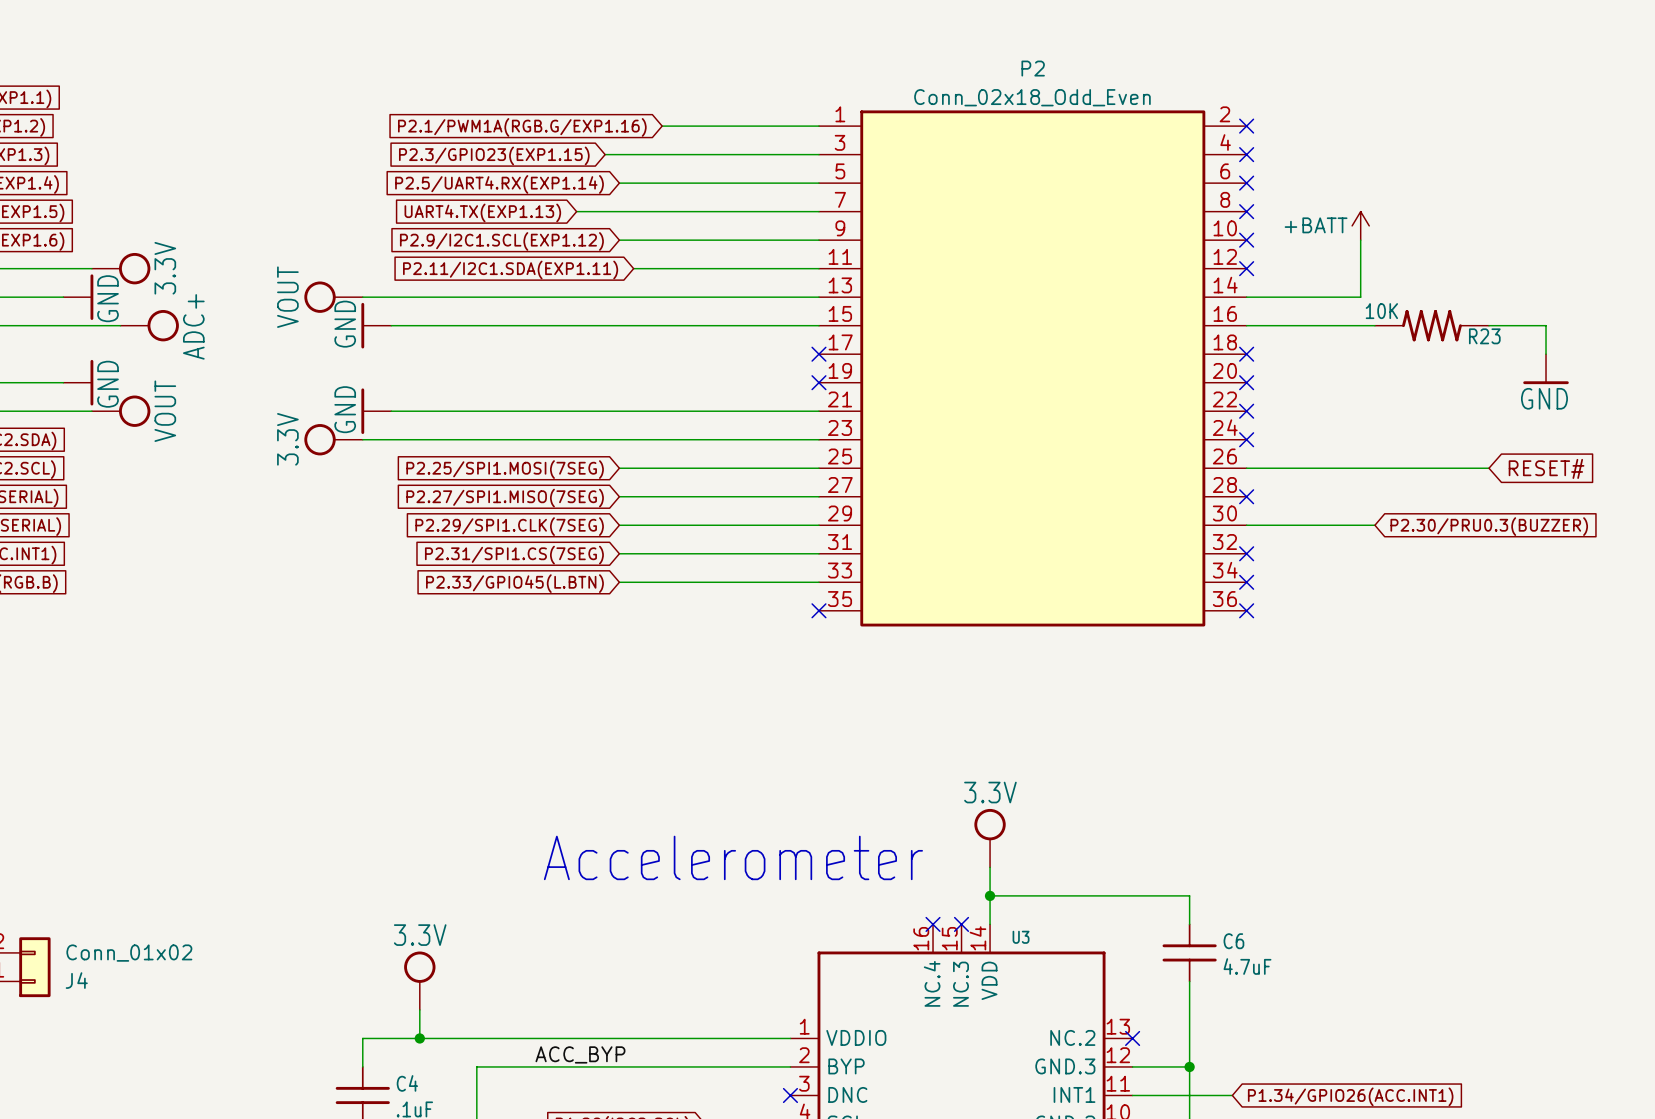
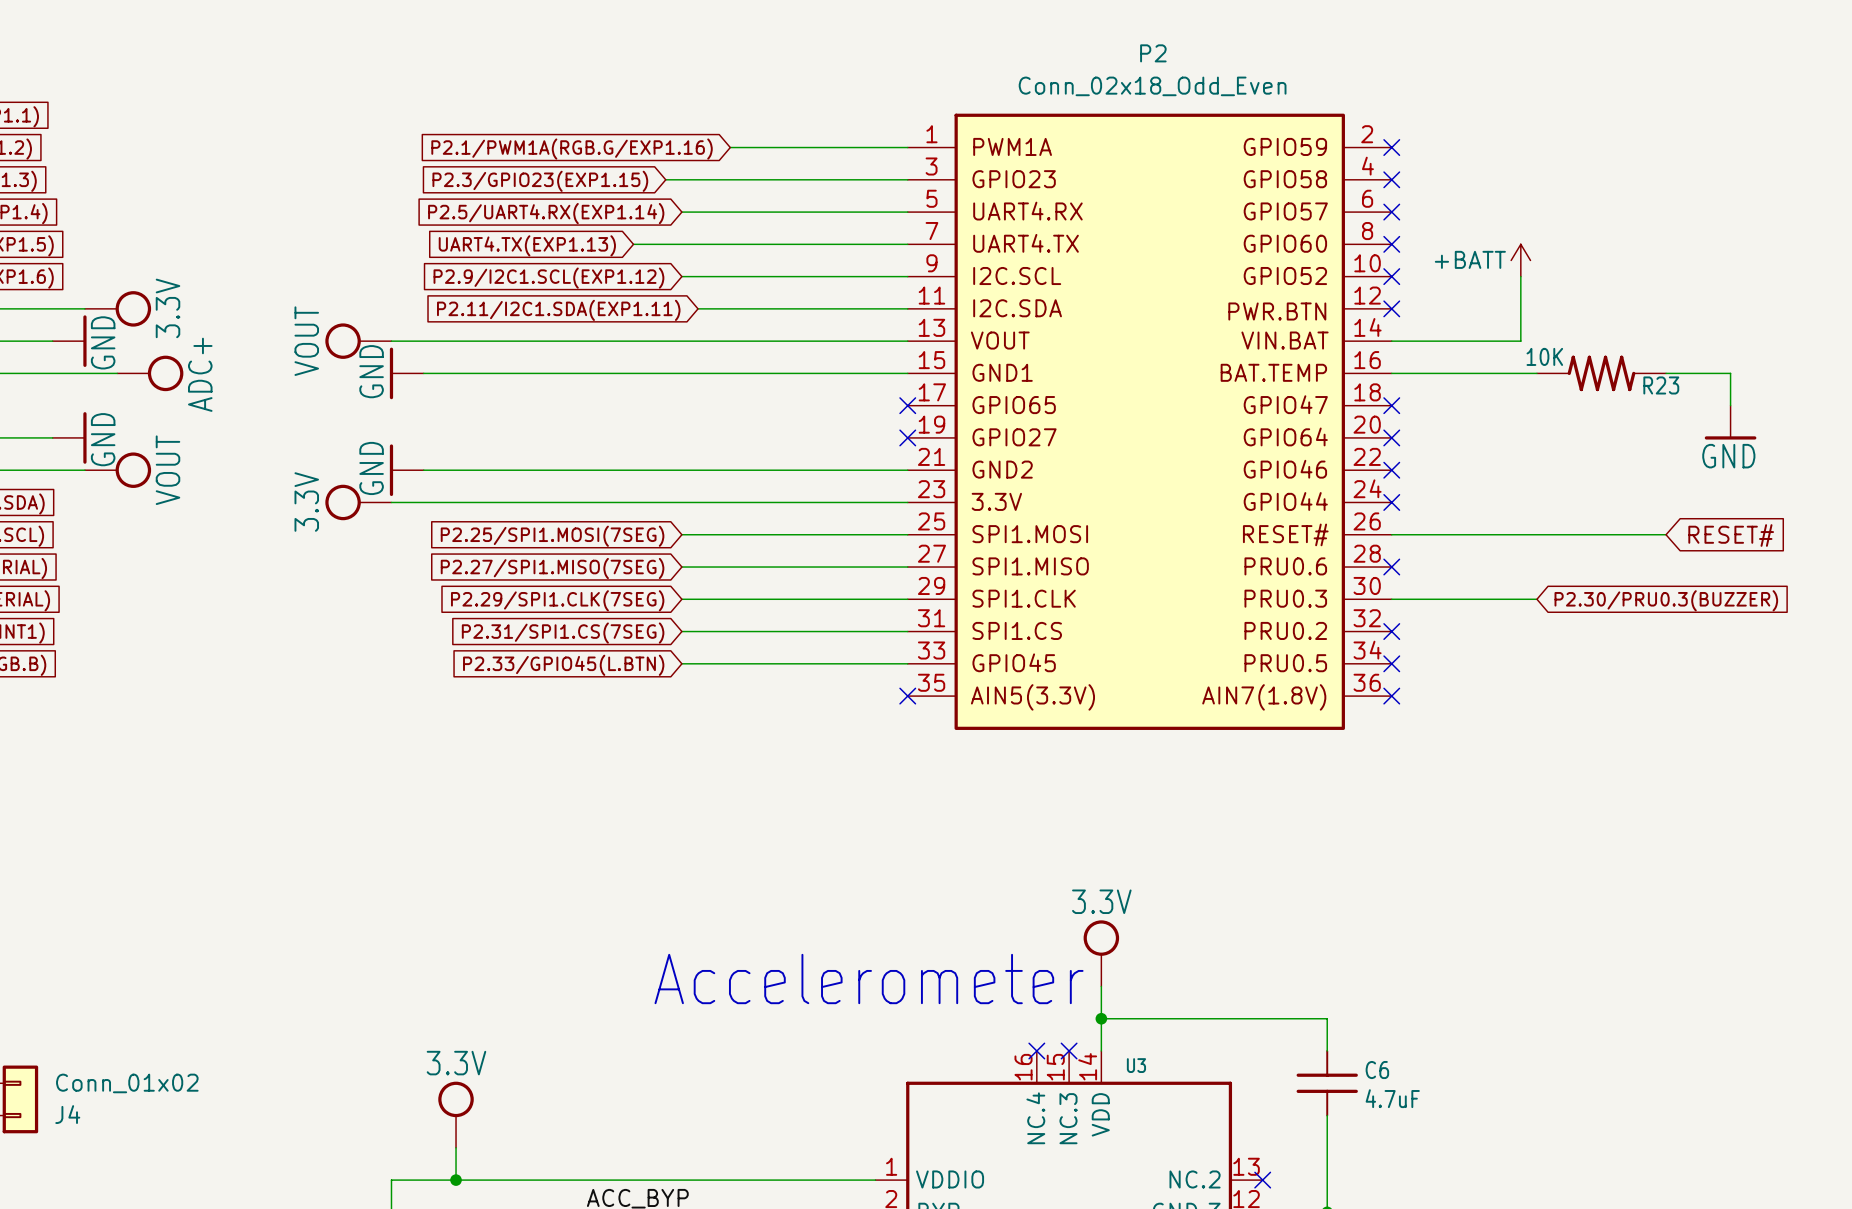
P2 name position: P2 (1033, 68) -> P2 (1153, 53)
P2 value position: Conn_02x18_Odd_Even (1032, 97) -> Conn_02x18_Odd_Even (1152, 86)
P2 symbol: [818, 110, 1247, 627] -> [907, 113, 1392, 730]
text position: Accelerometer (733, 857) -> Accelerometer (869, 979)

